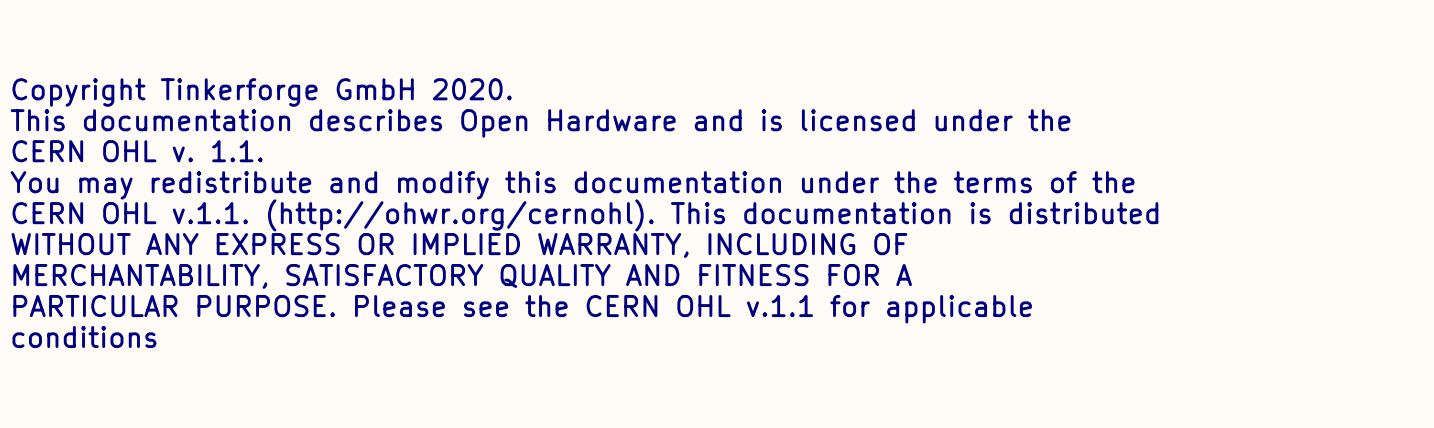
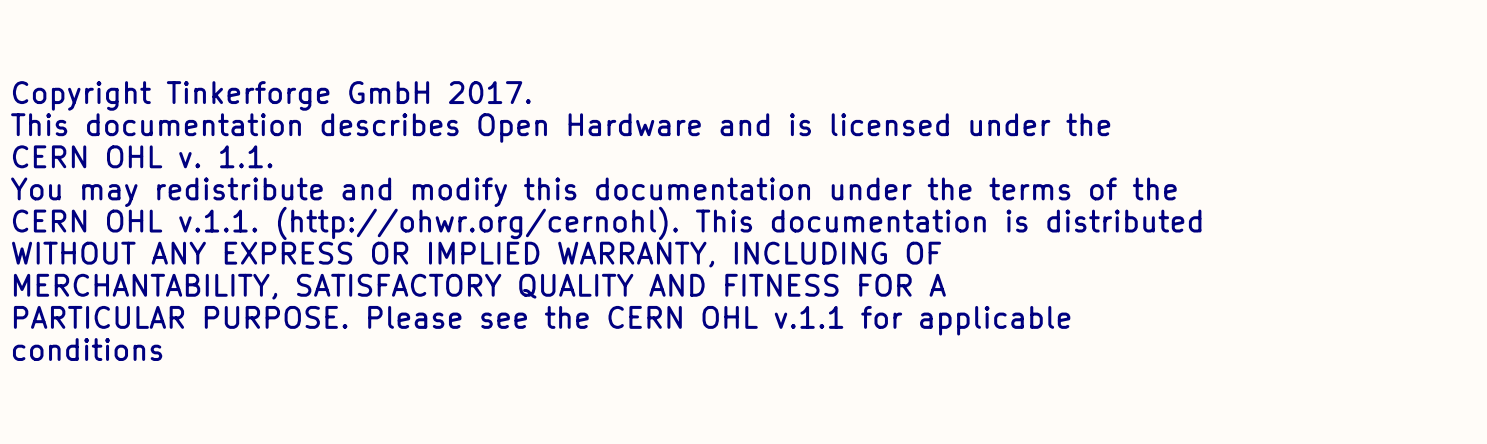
text: Copyright Tinkerforge GmbH 2020. (262, 92) -> Copyright Tinkerforge GmbH 2017. (271, 95)

